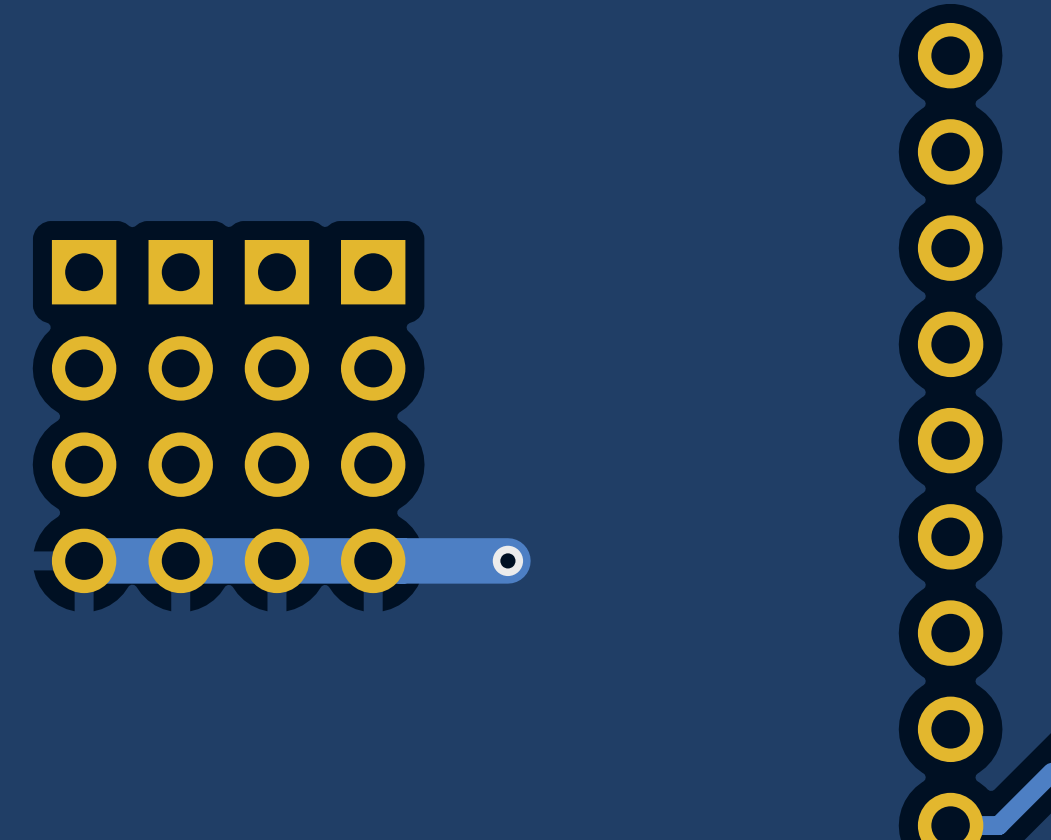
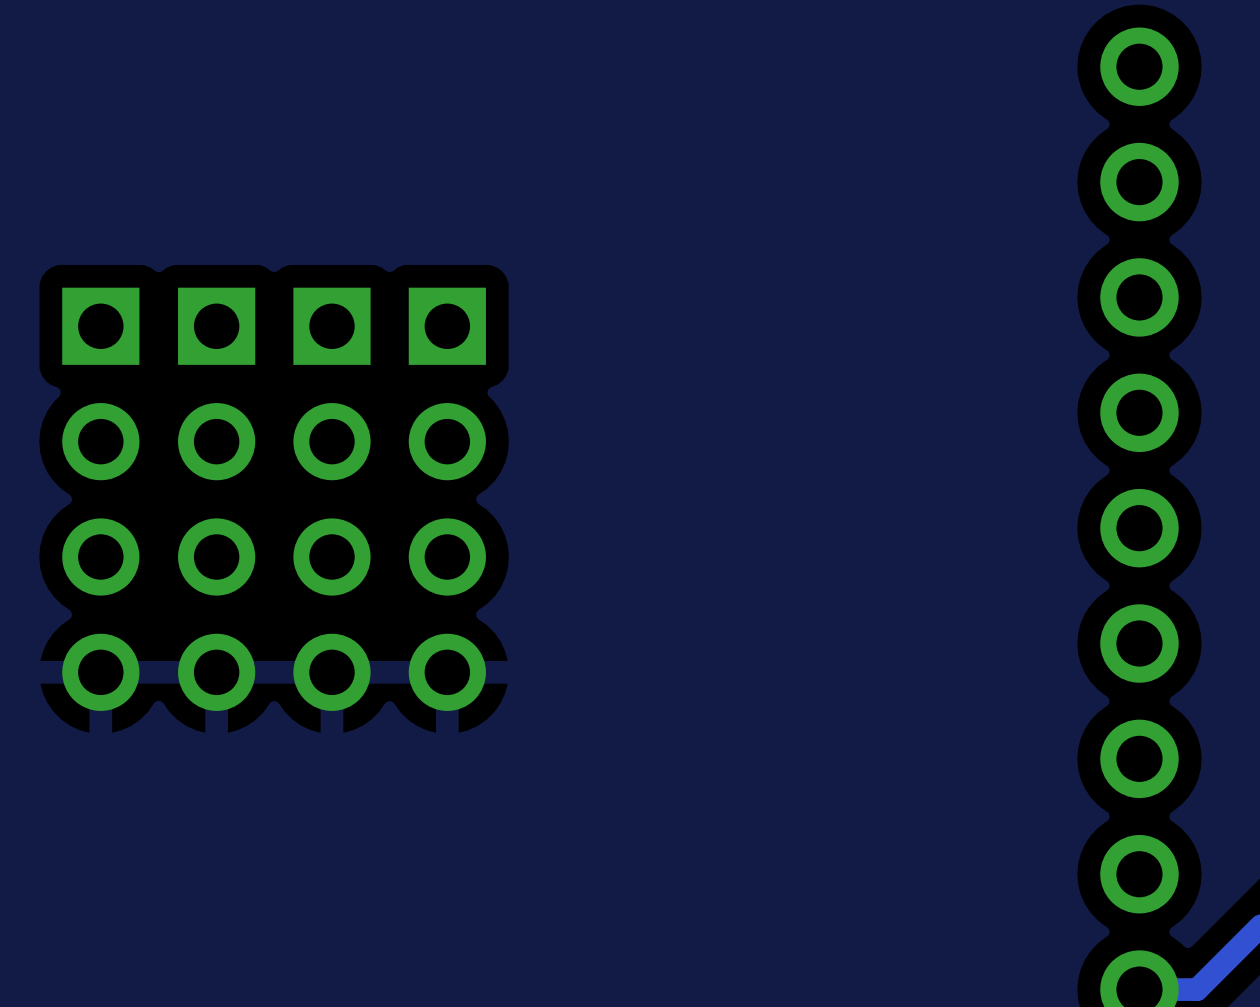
track: (507, 560) (84, 560) -> none
via: (507, 560) -> none

